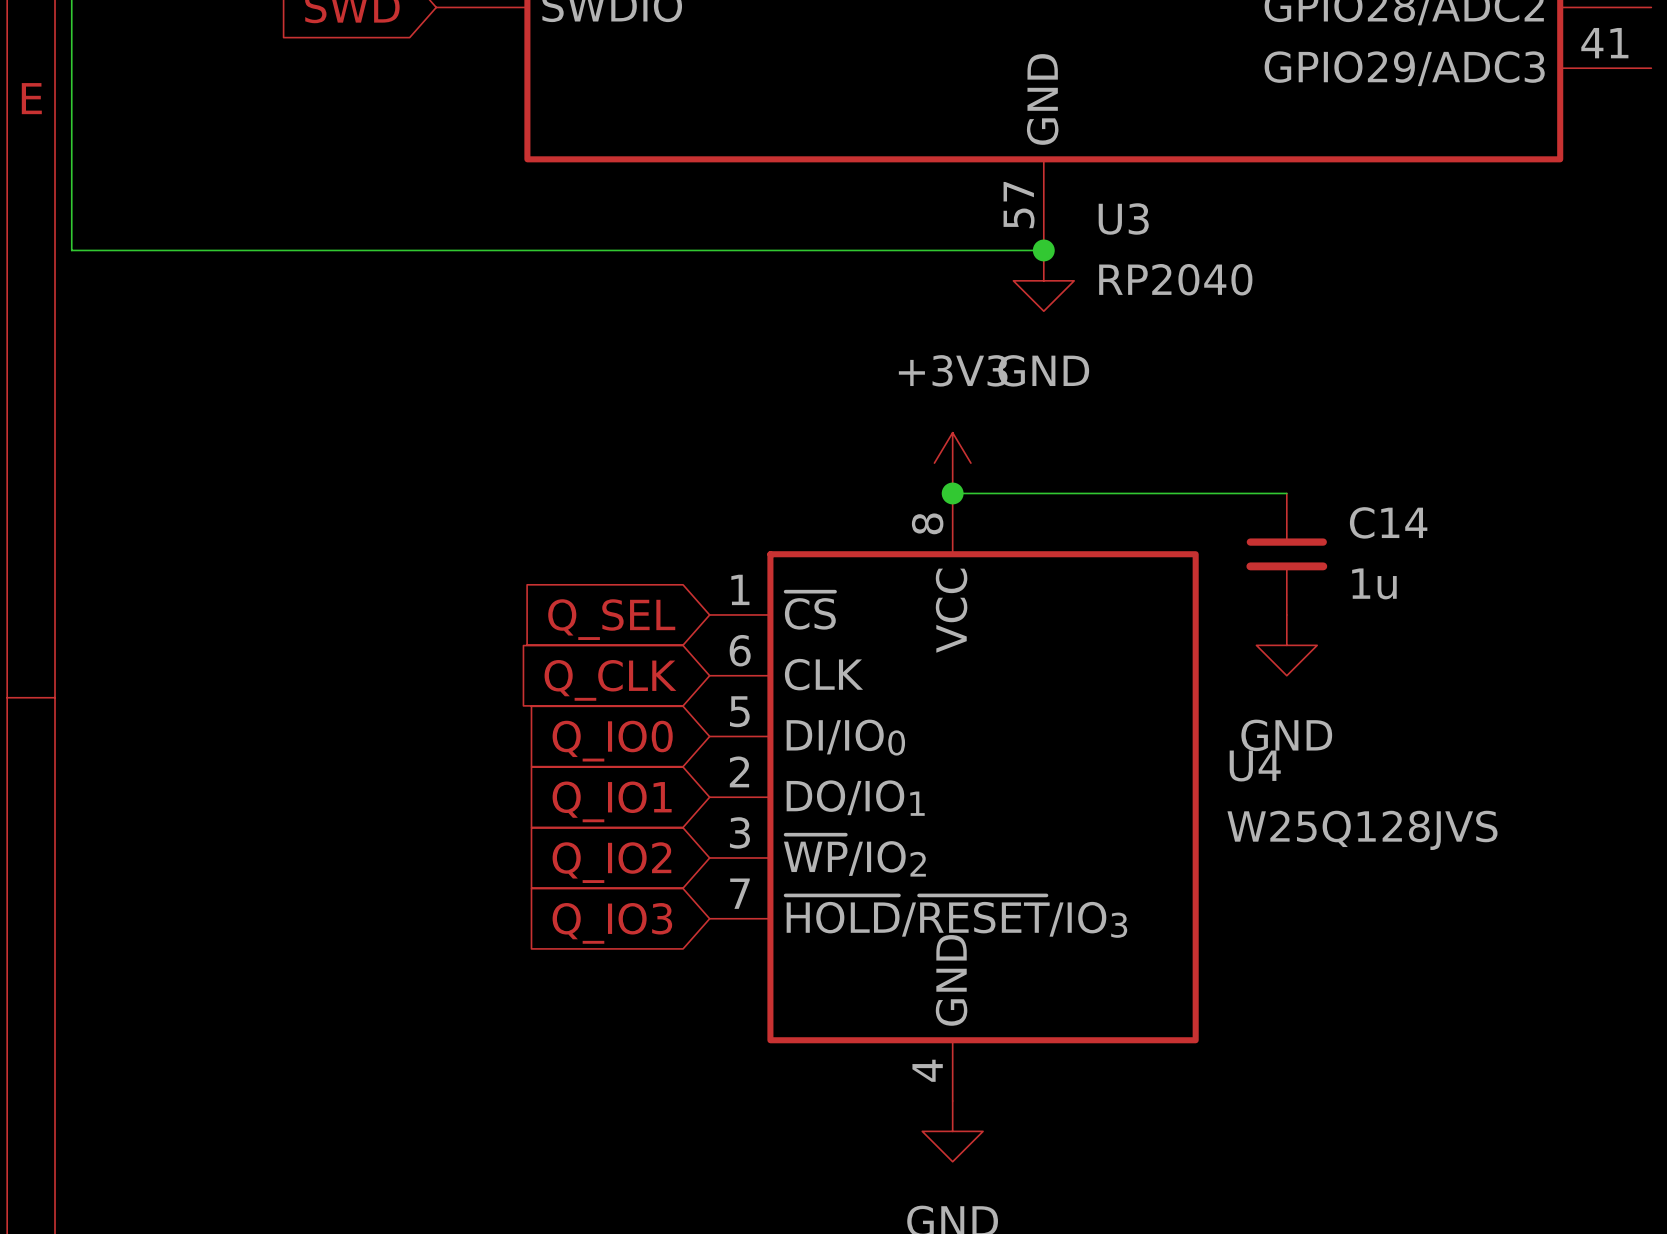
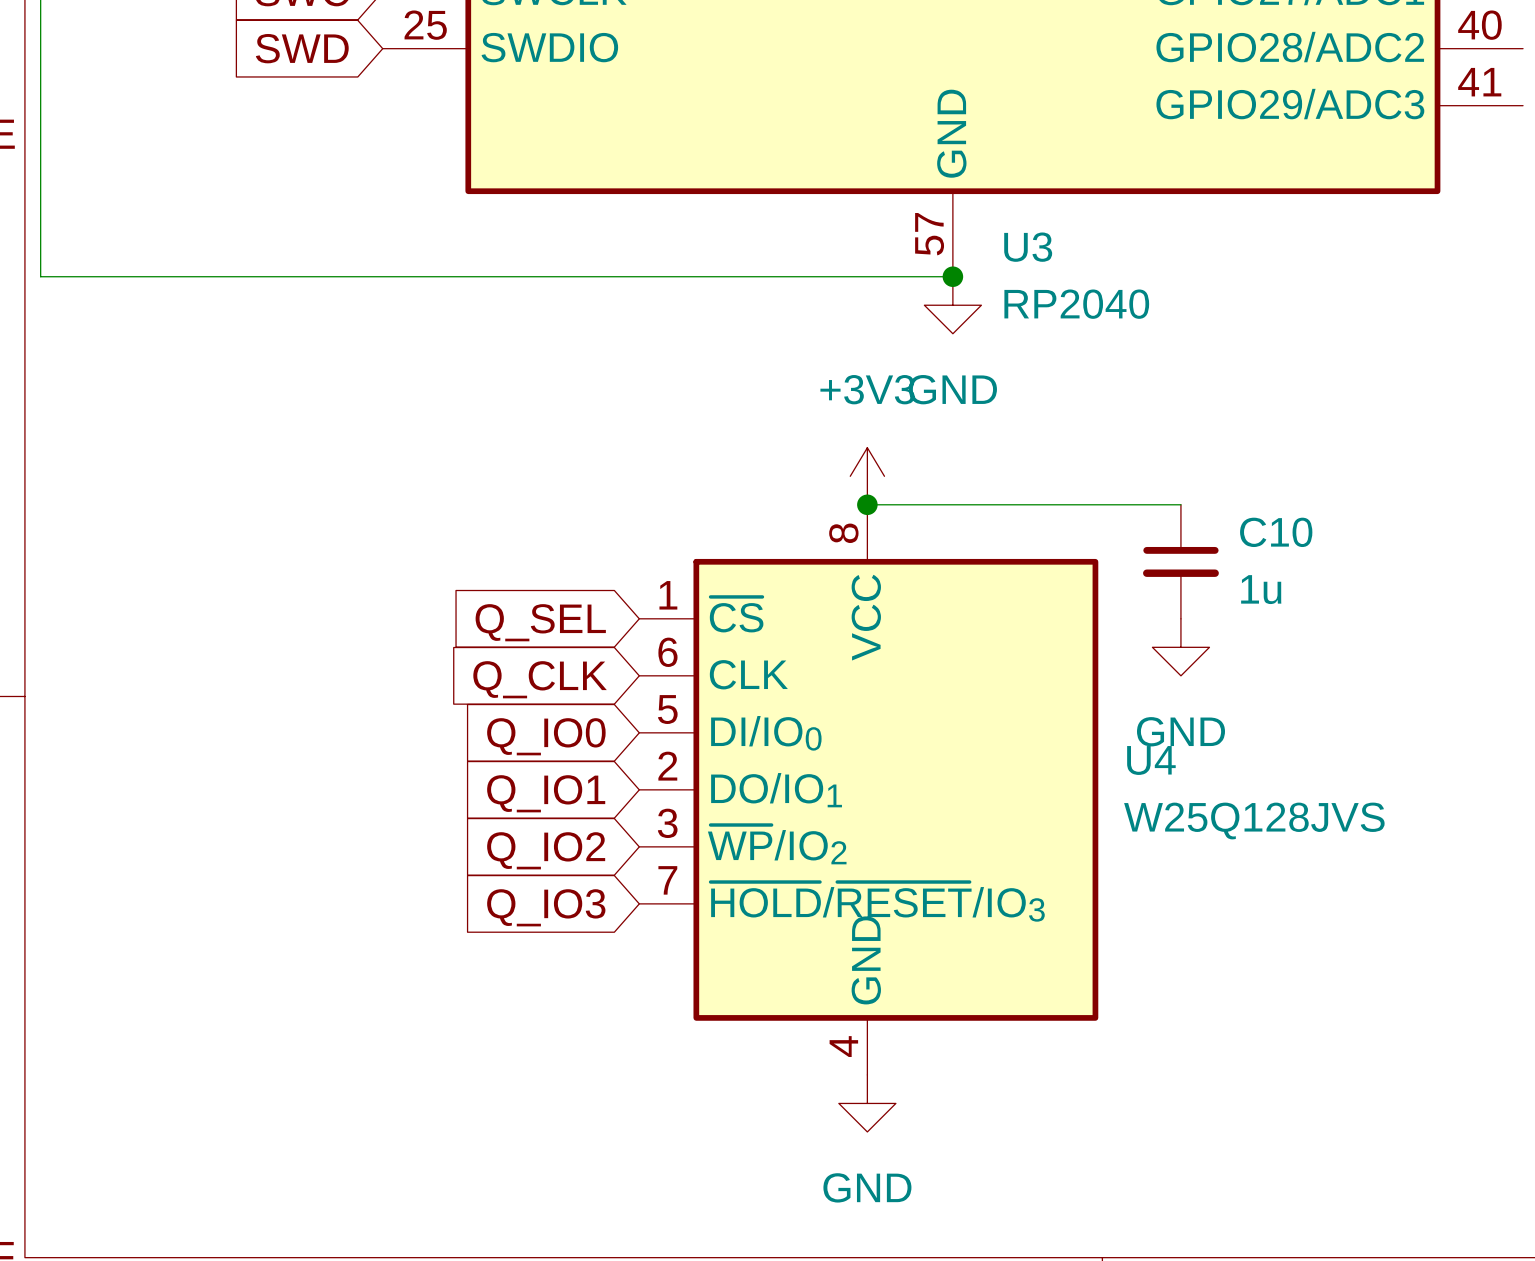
C14 name: C14 (1388, 522) -> C10 (1276, 532)

